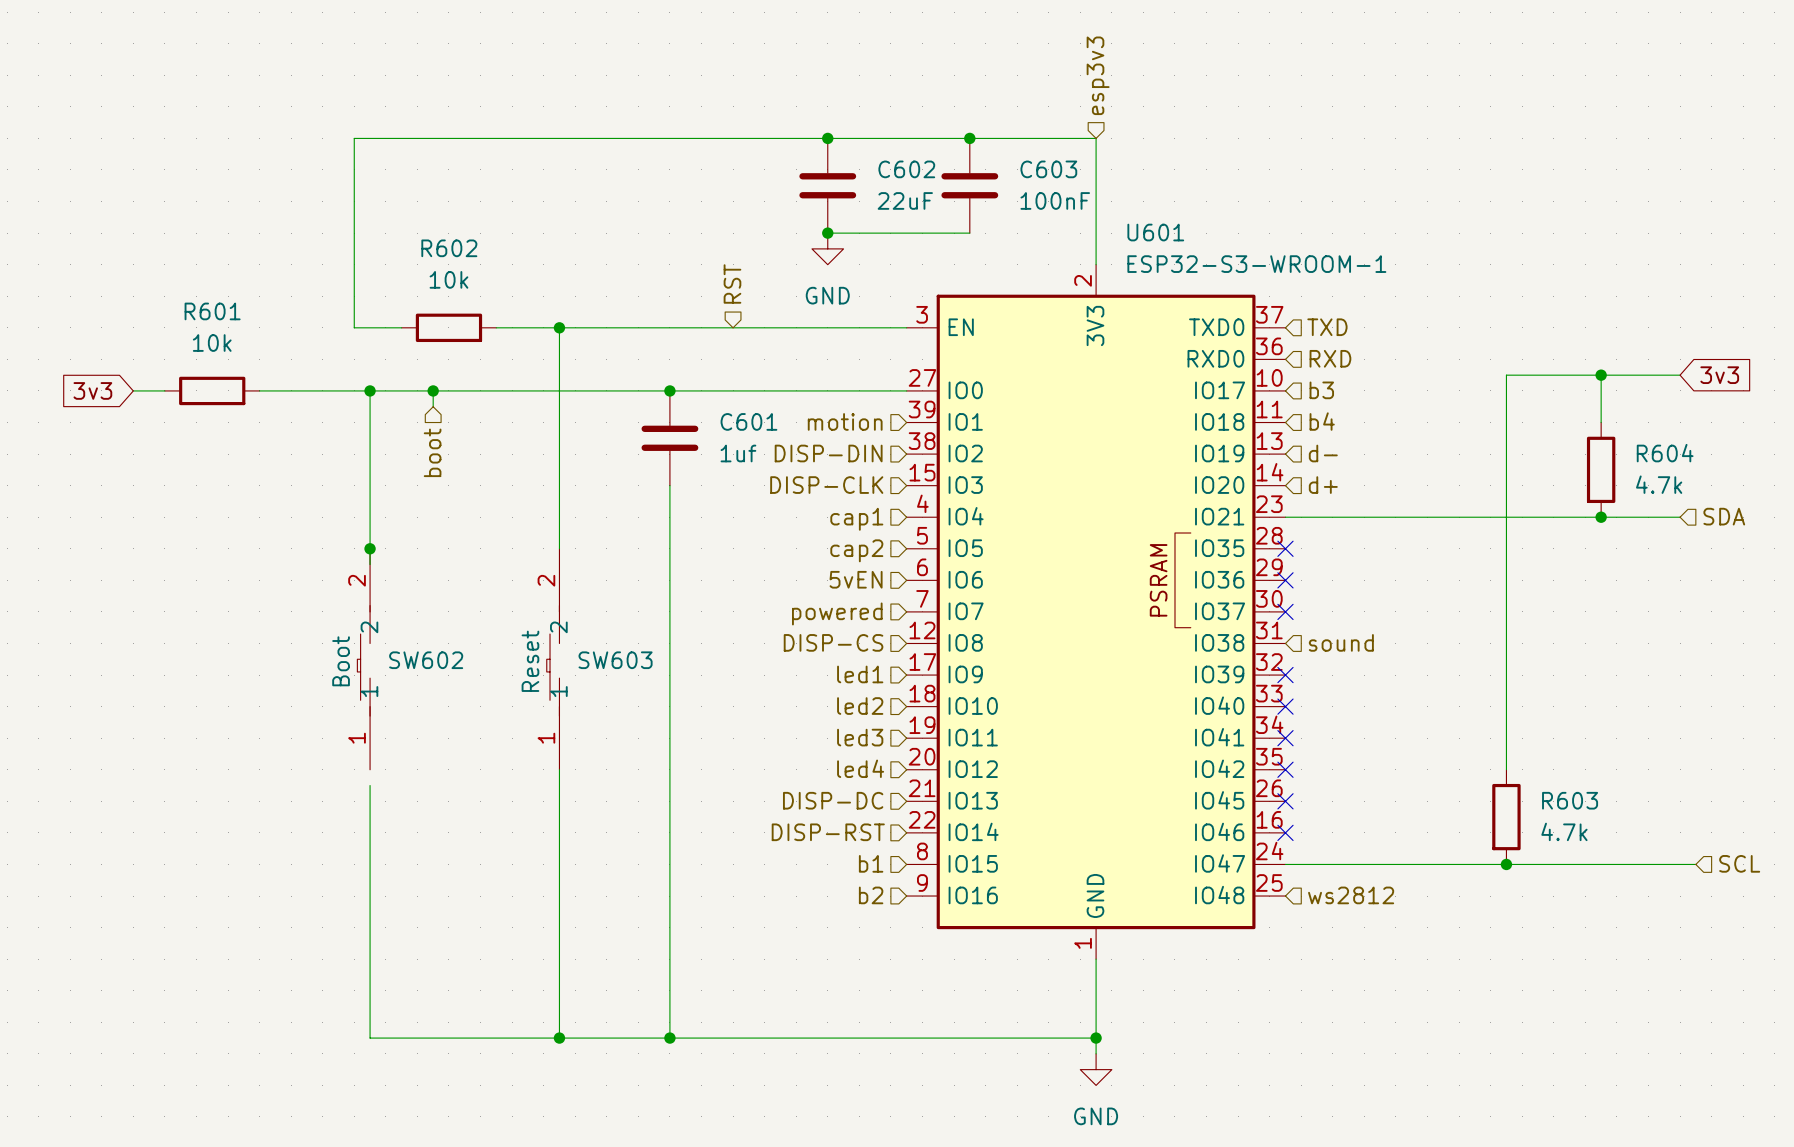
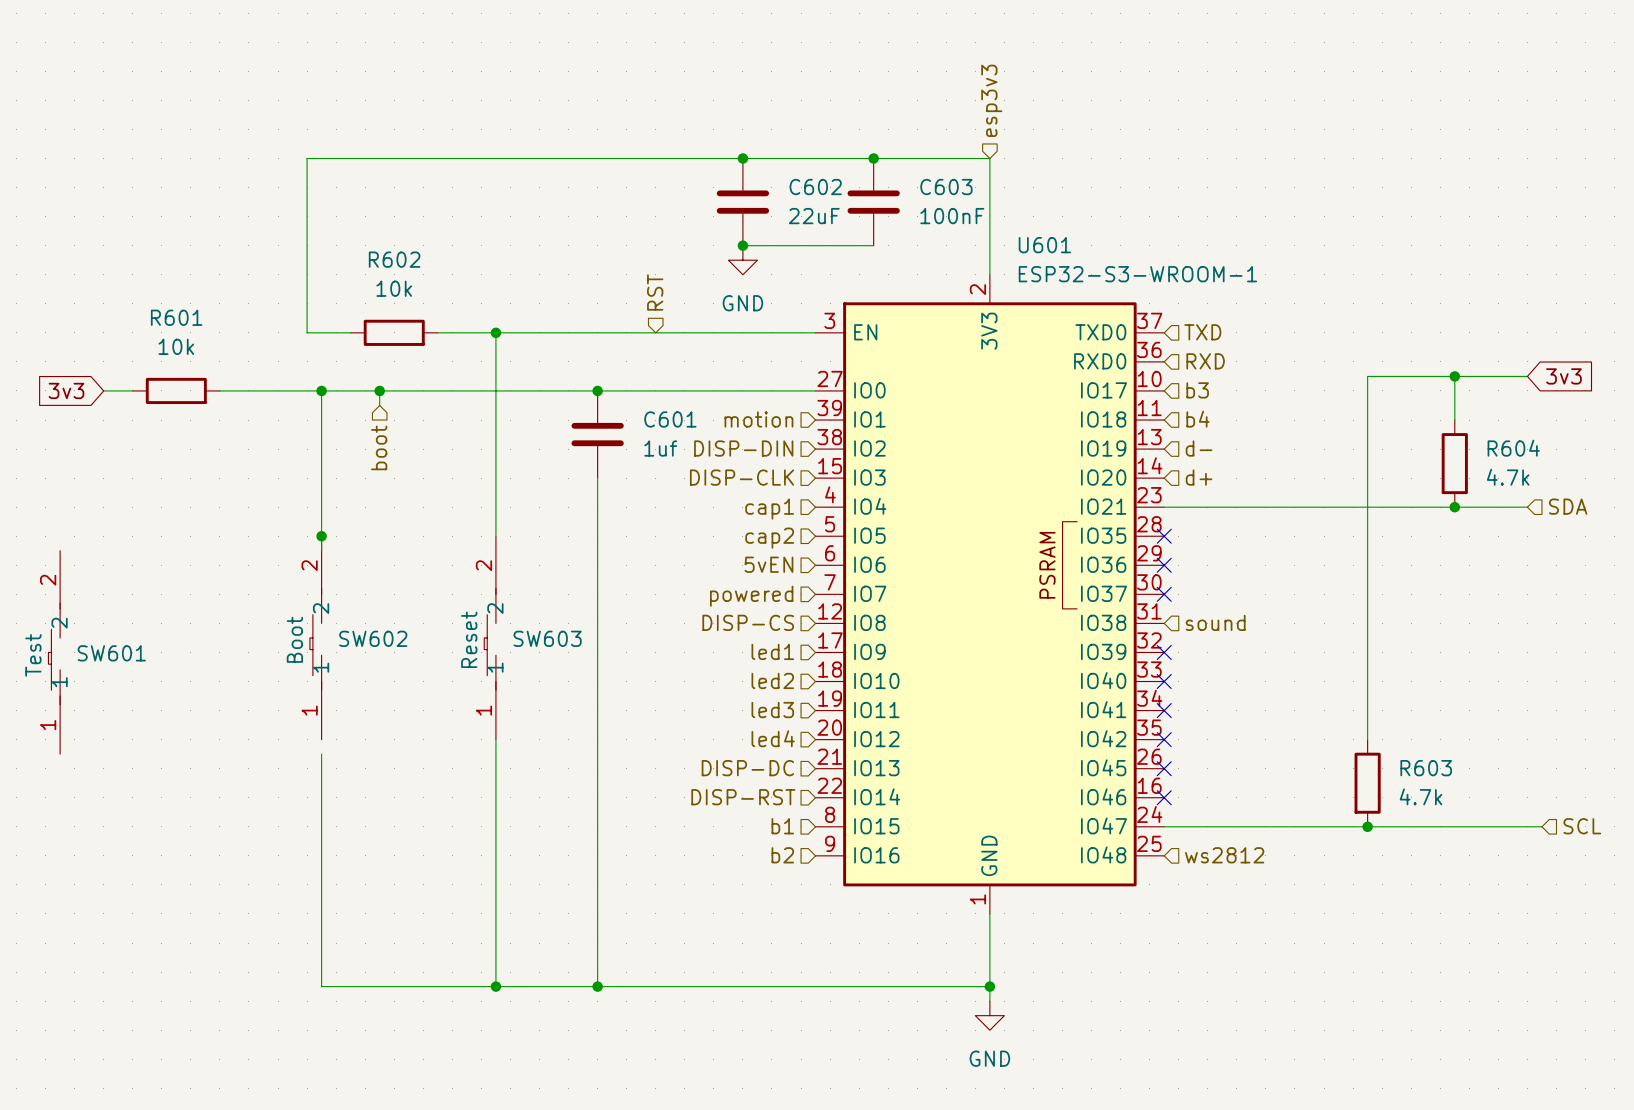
SW601: none -> (54, 652)

